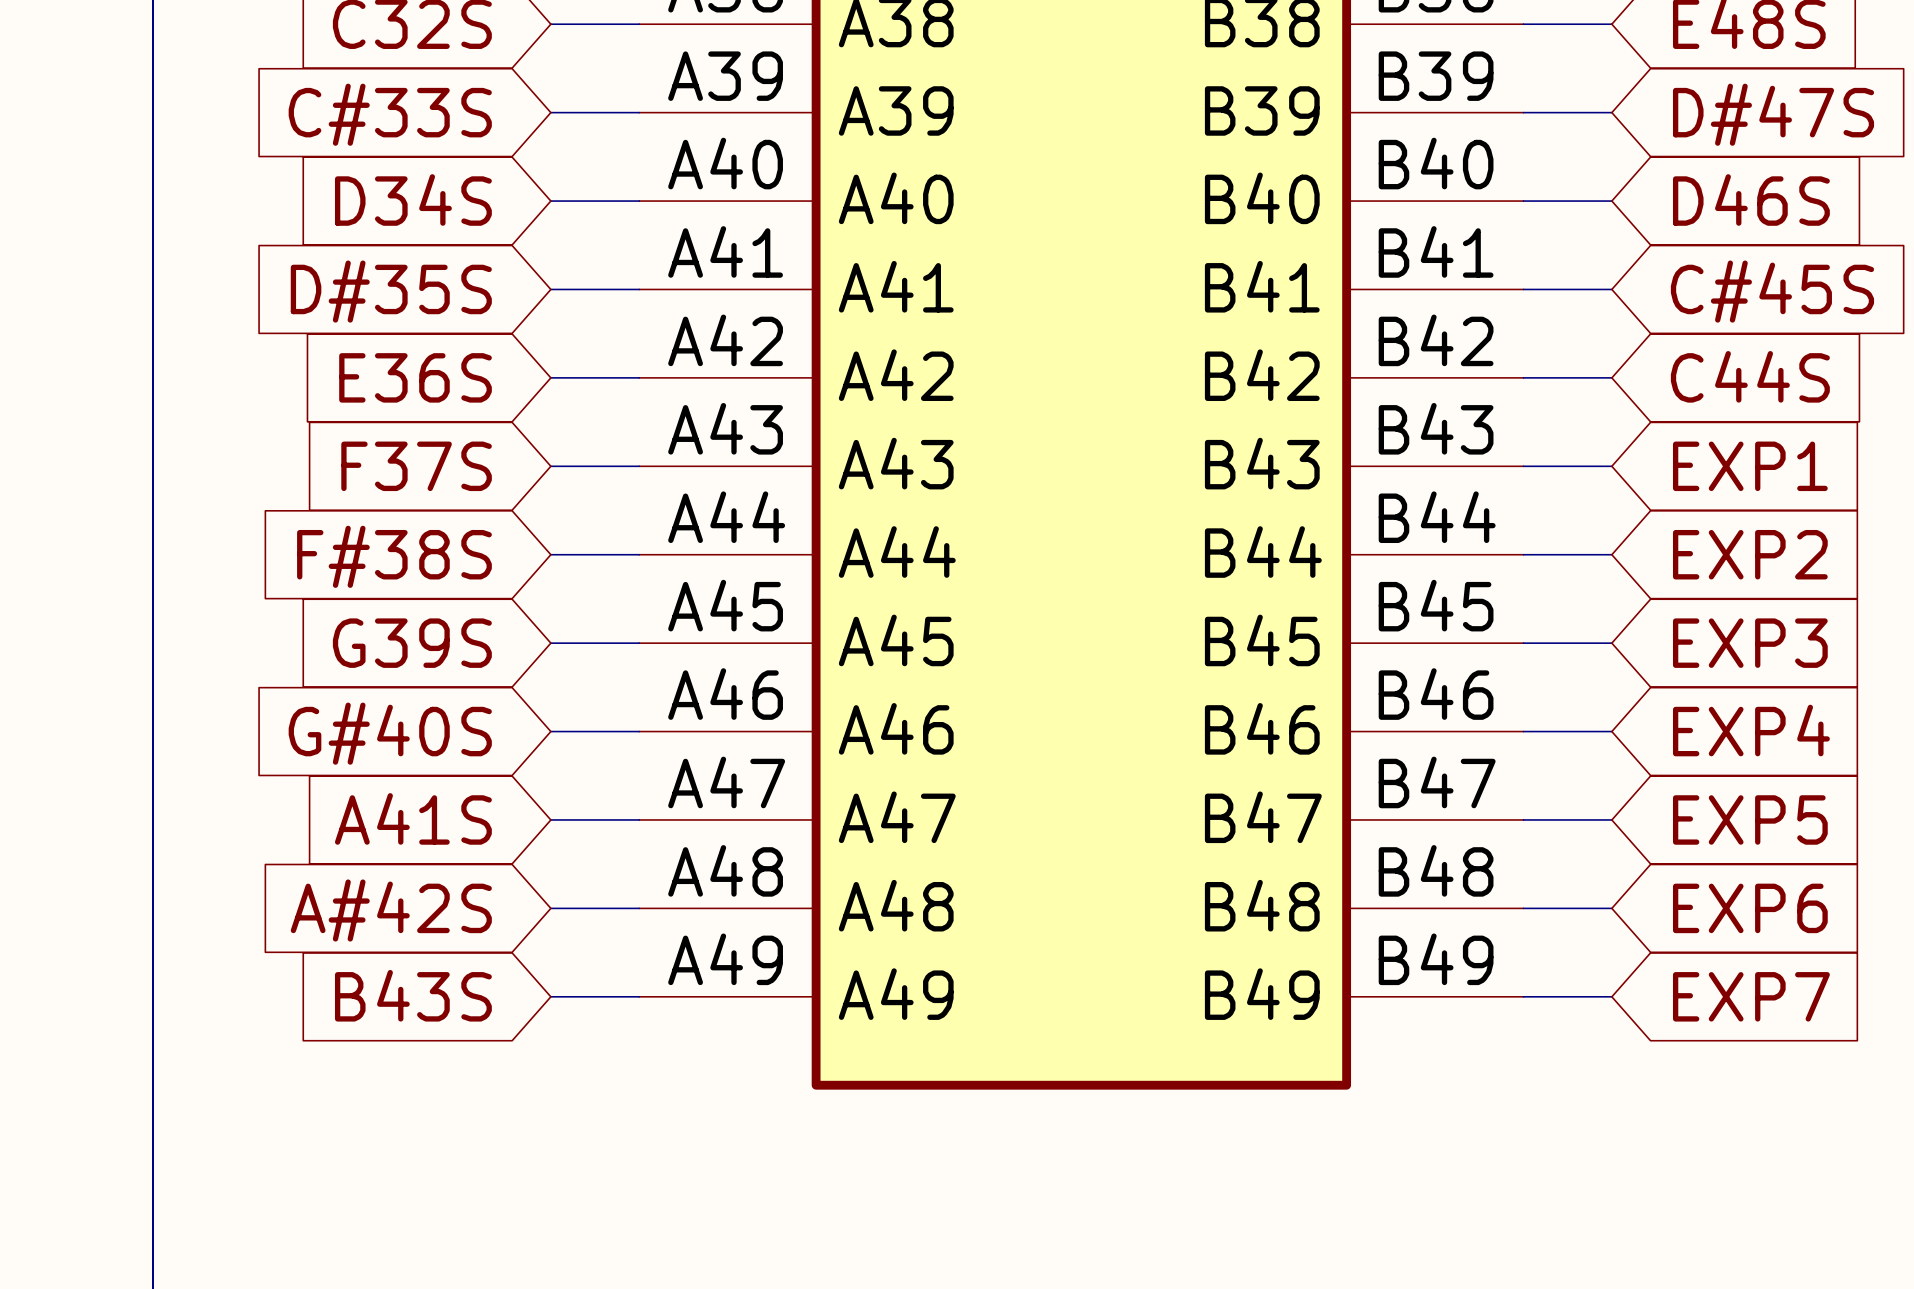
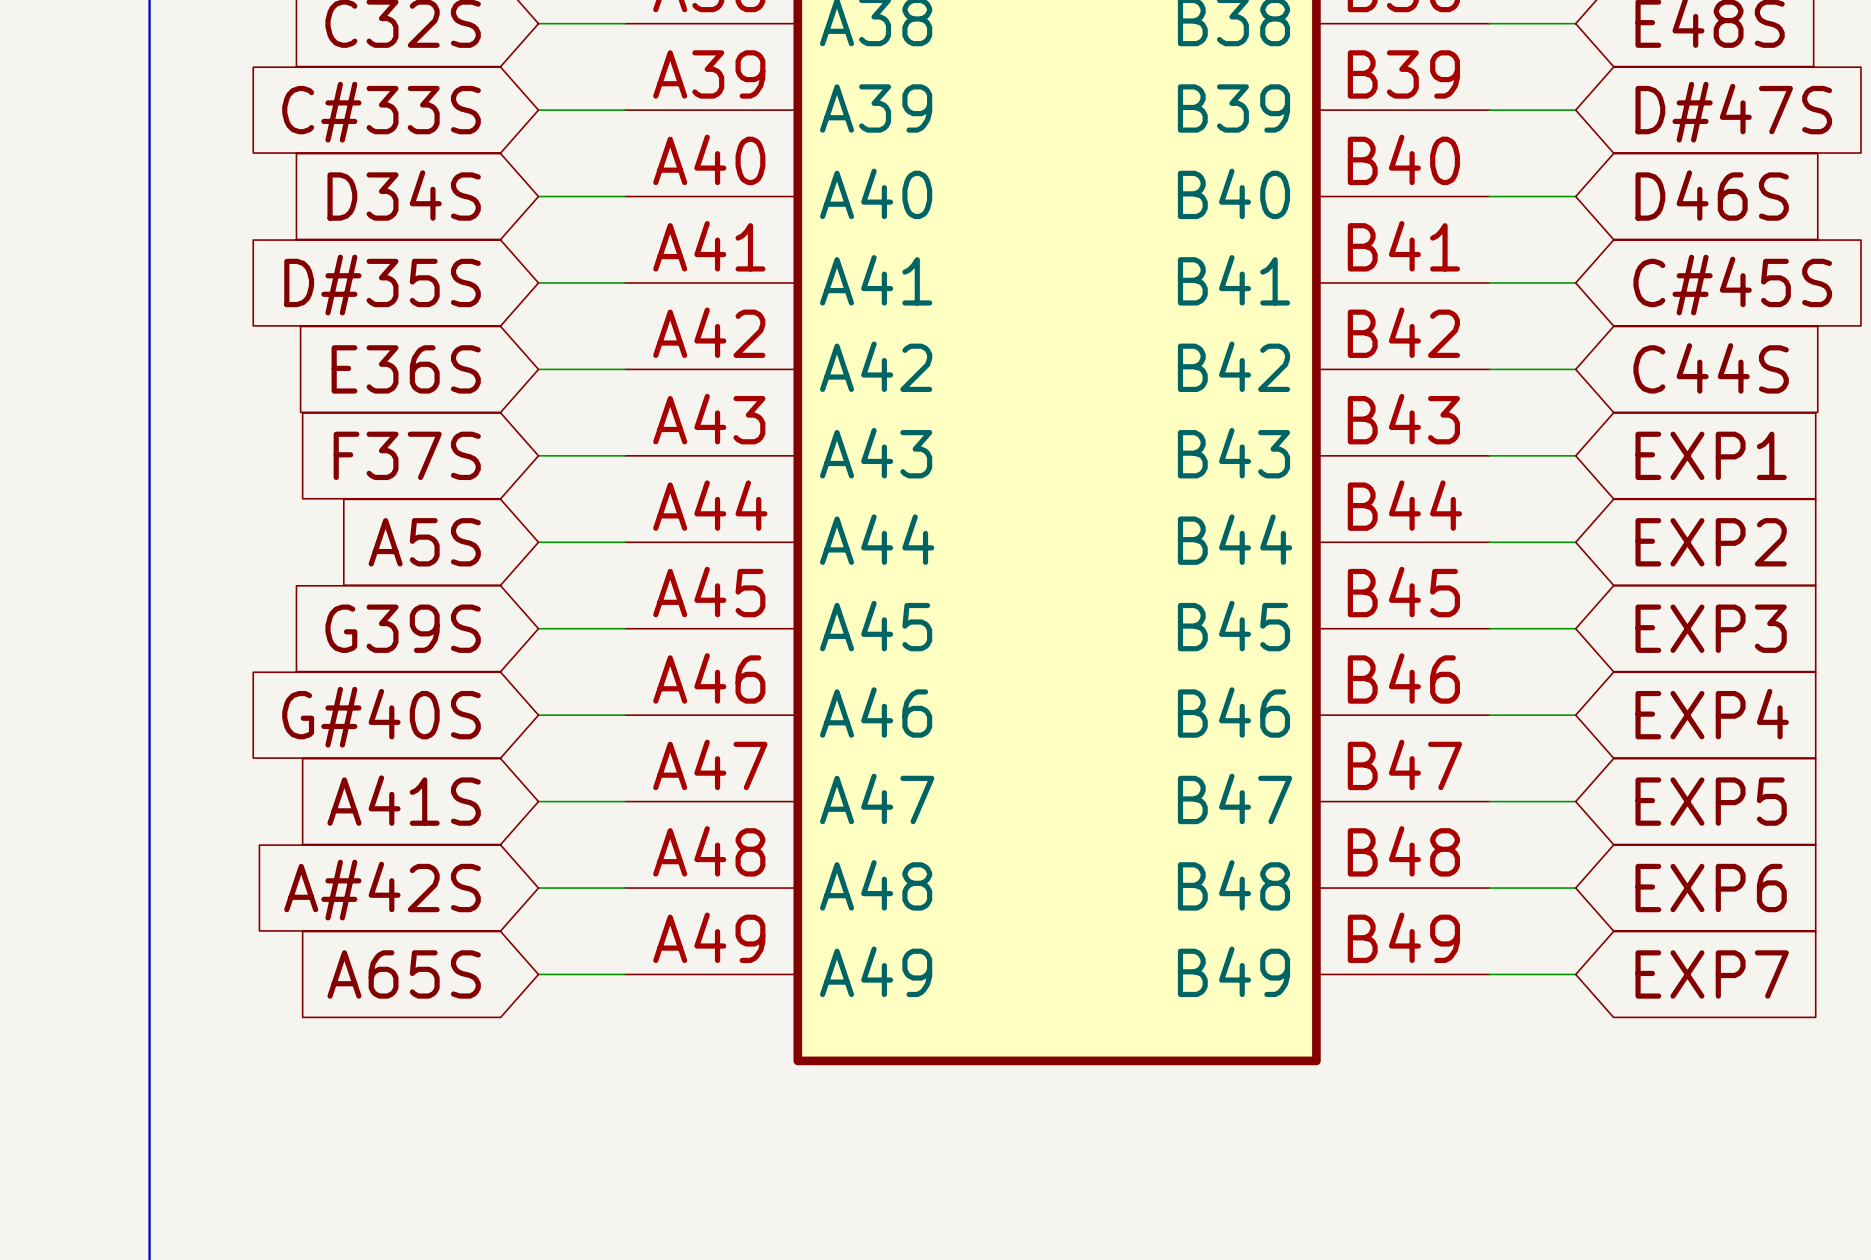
global label: F#38S (394, 556) -> A5S (424, 542)
global label: B43S (413, 995) -> A65S (404, 974)

